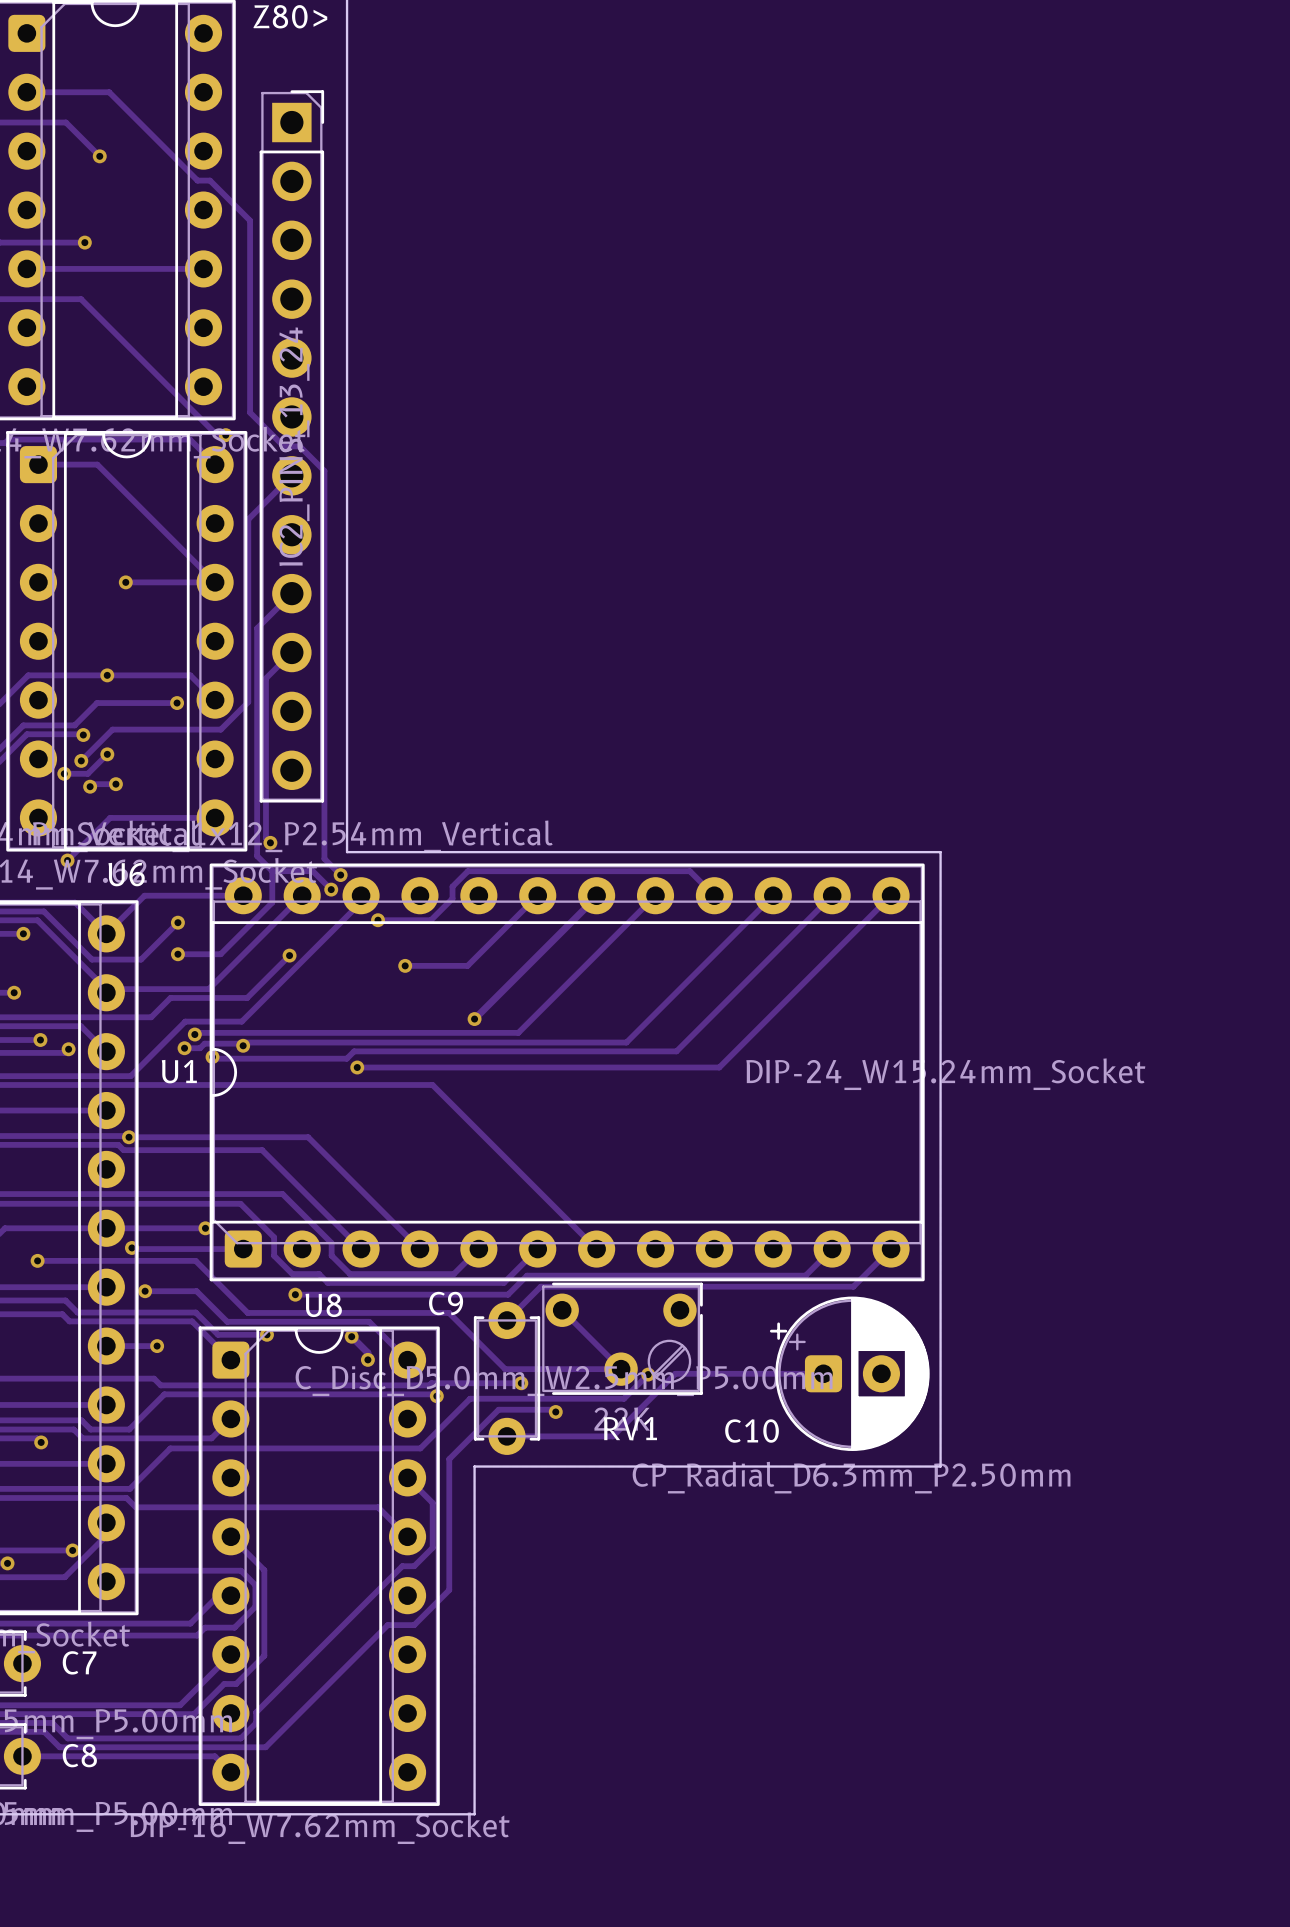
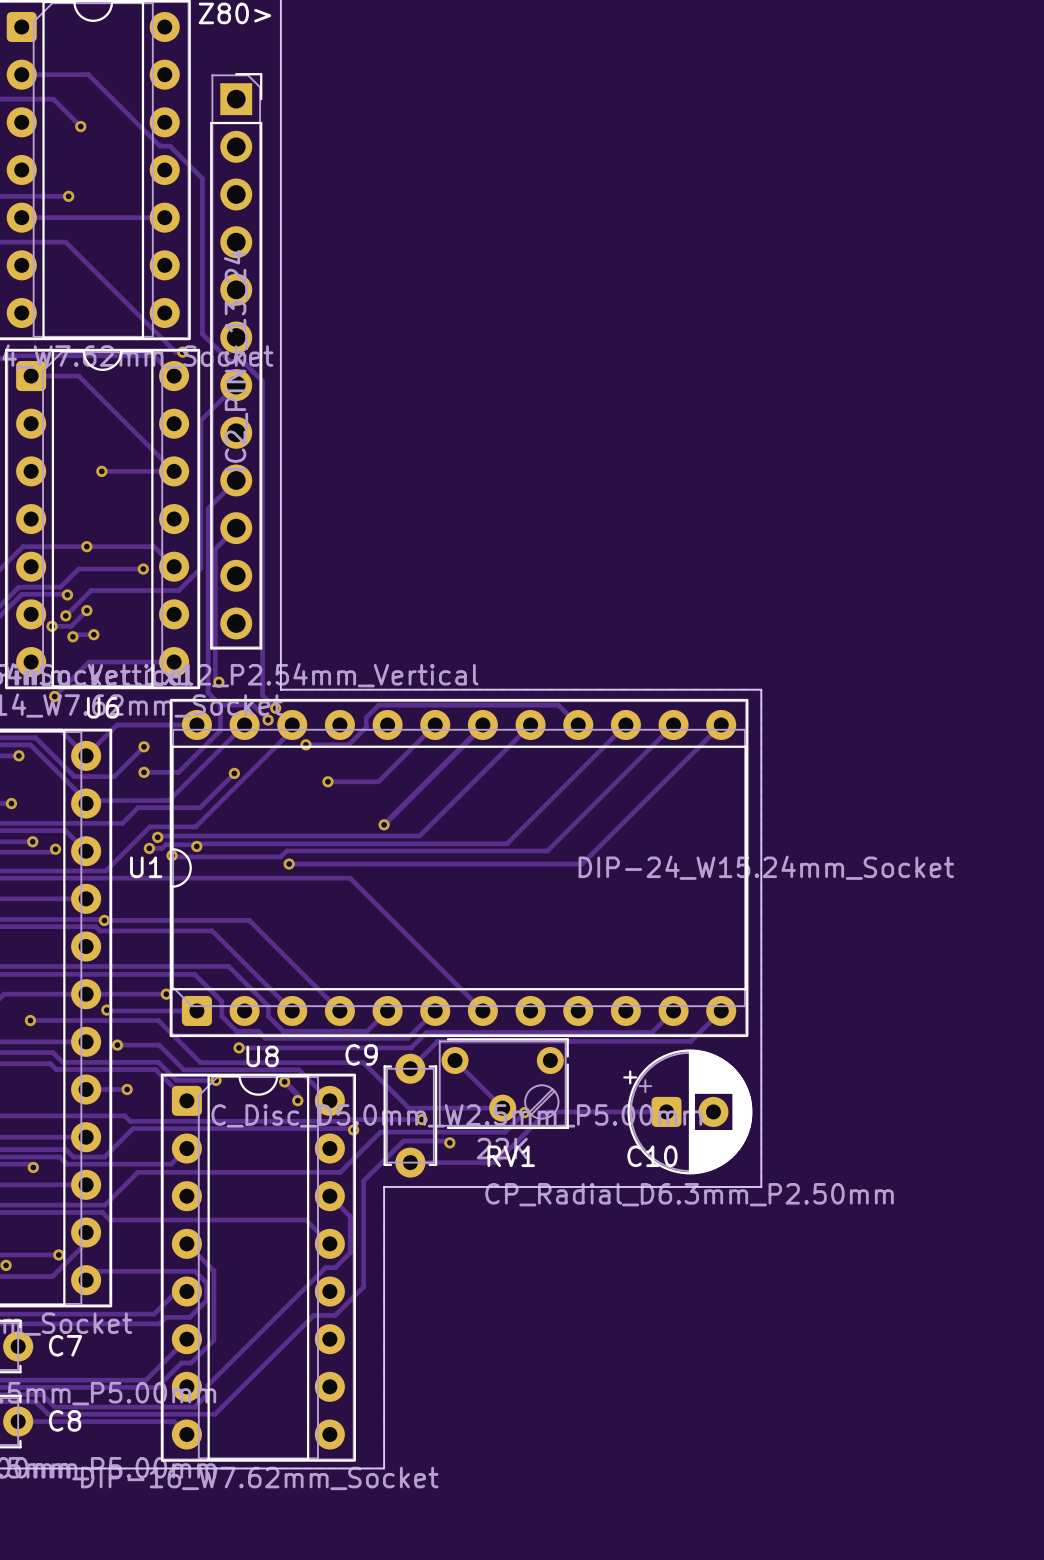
C10 name position: C10 (752, 1431) -> C10 (652, 1156)

